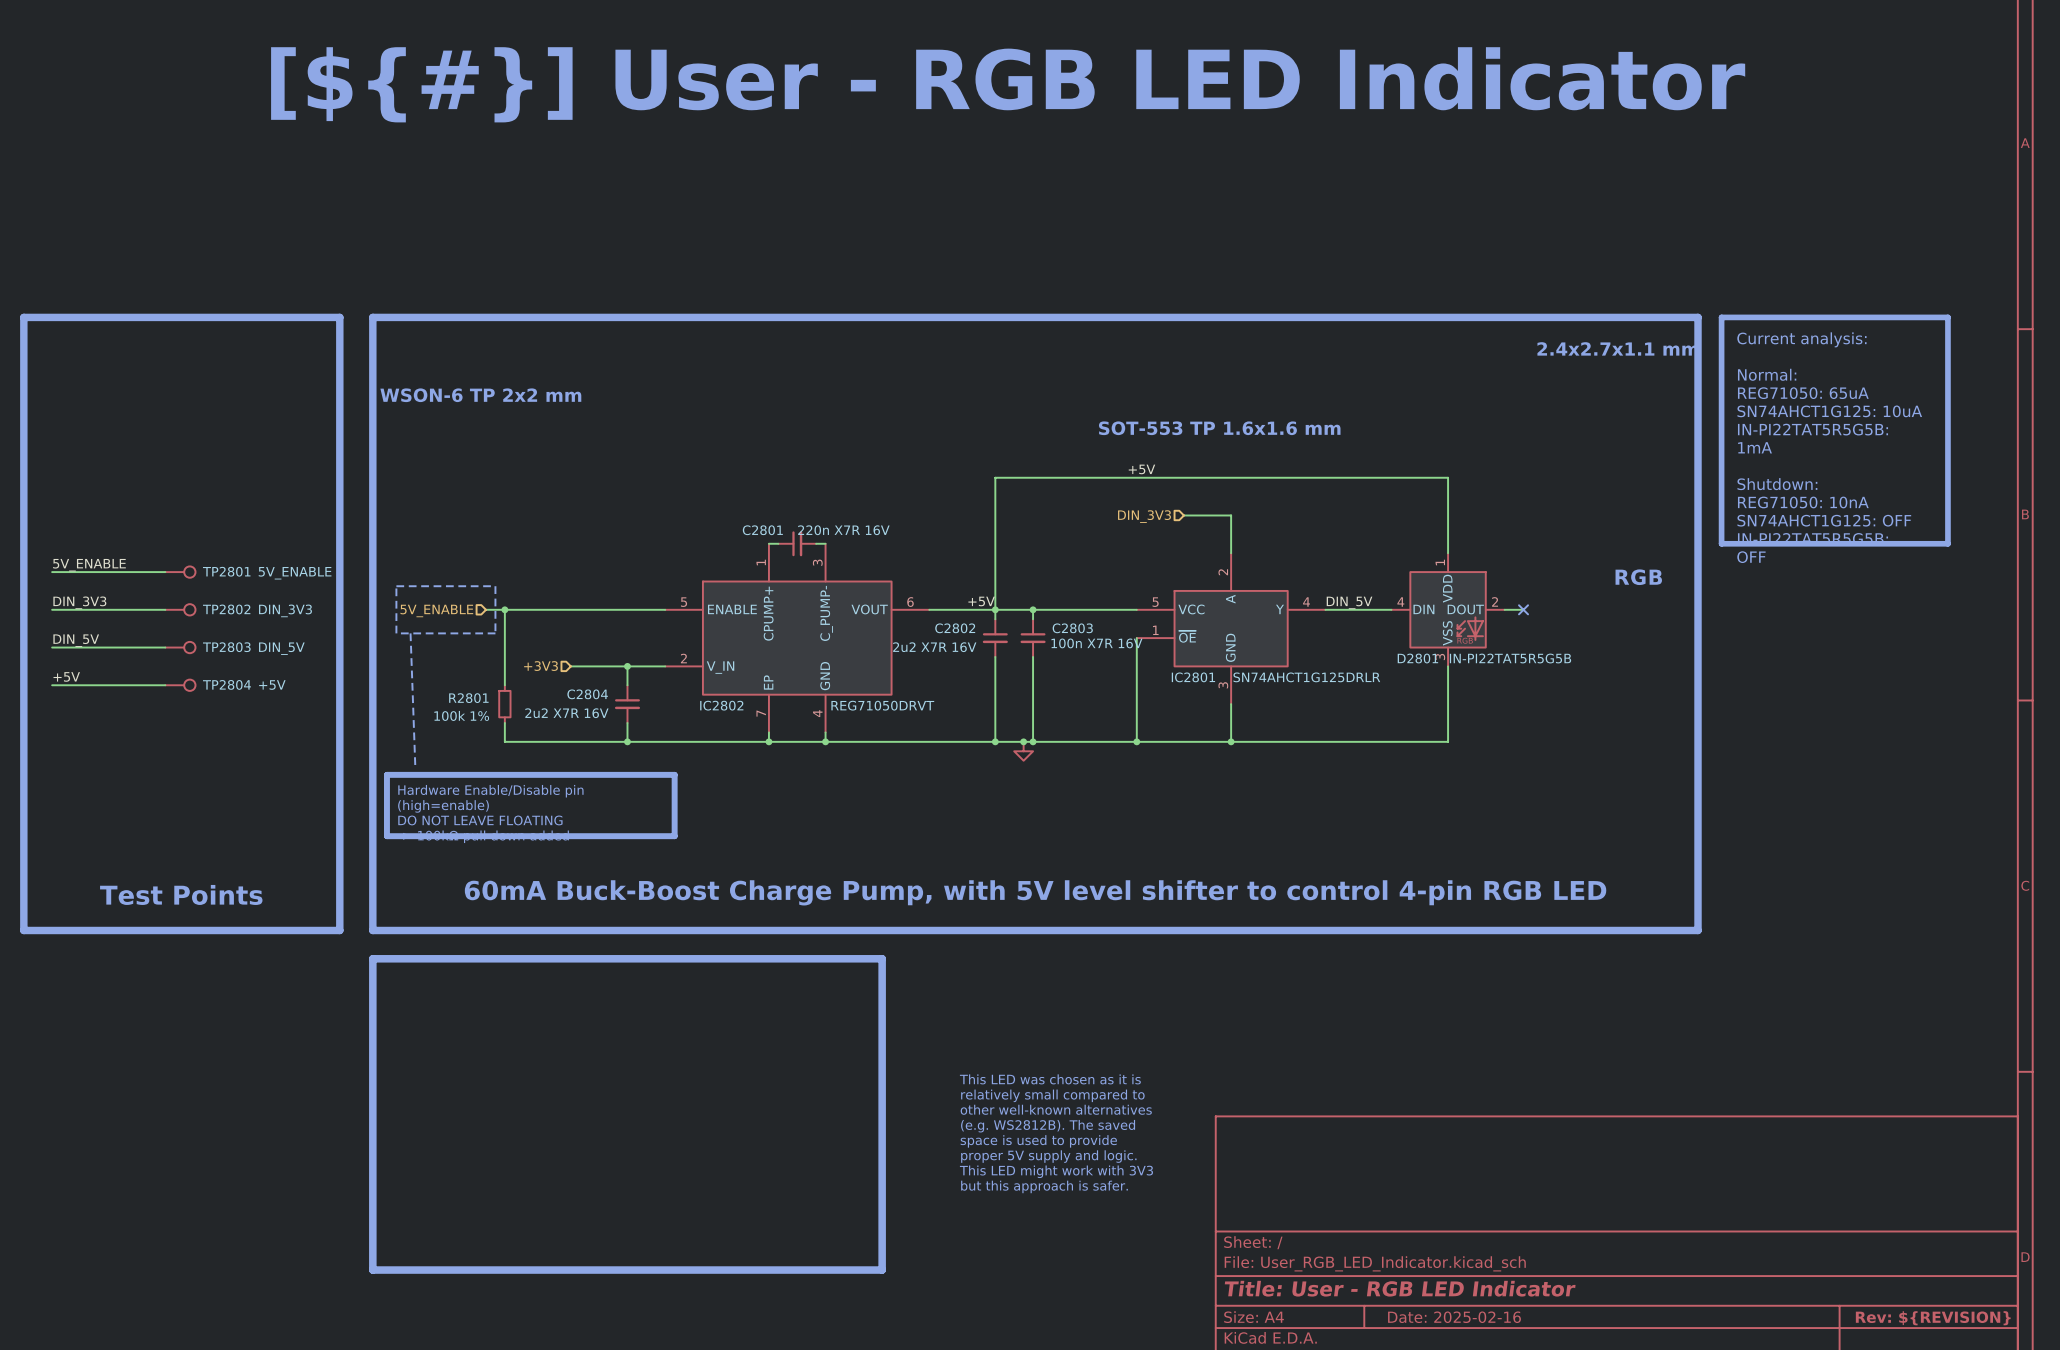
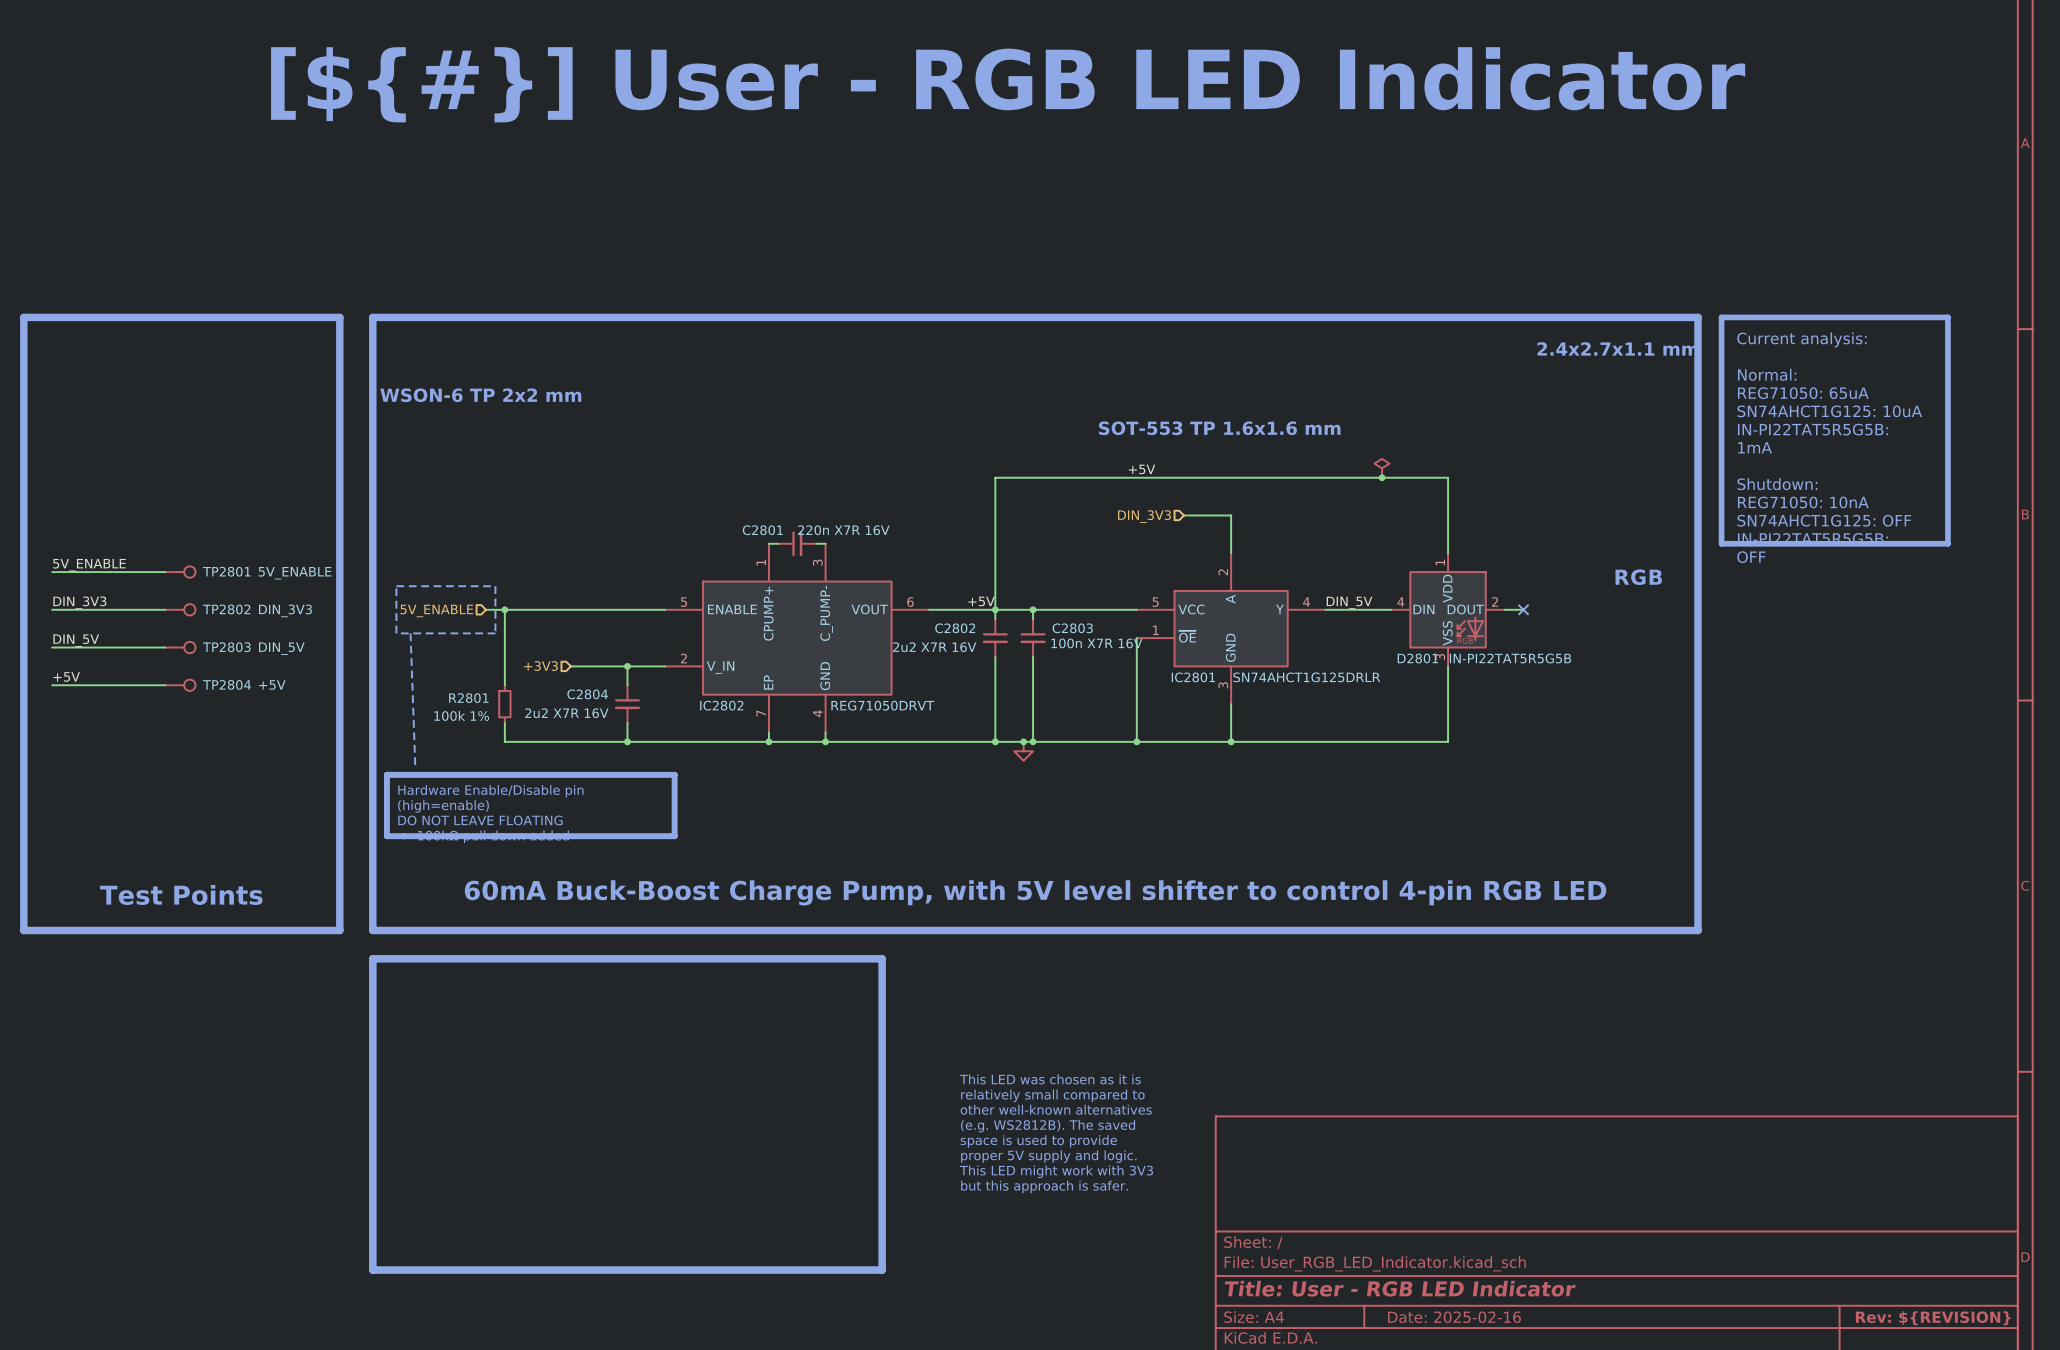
power symbol: none -> (1382, 468)
junction: none -> (1382, 477)

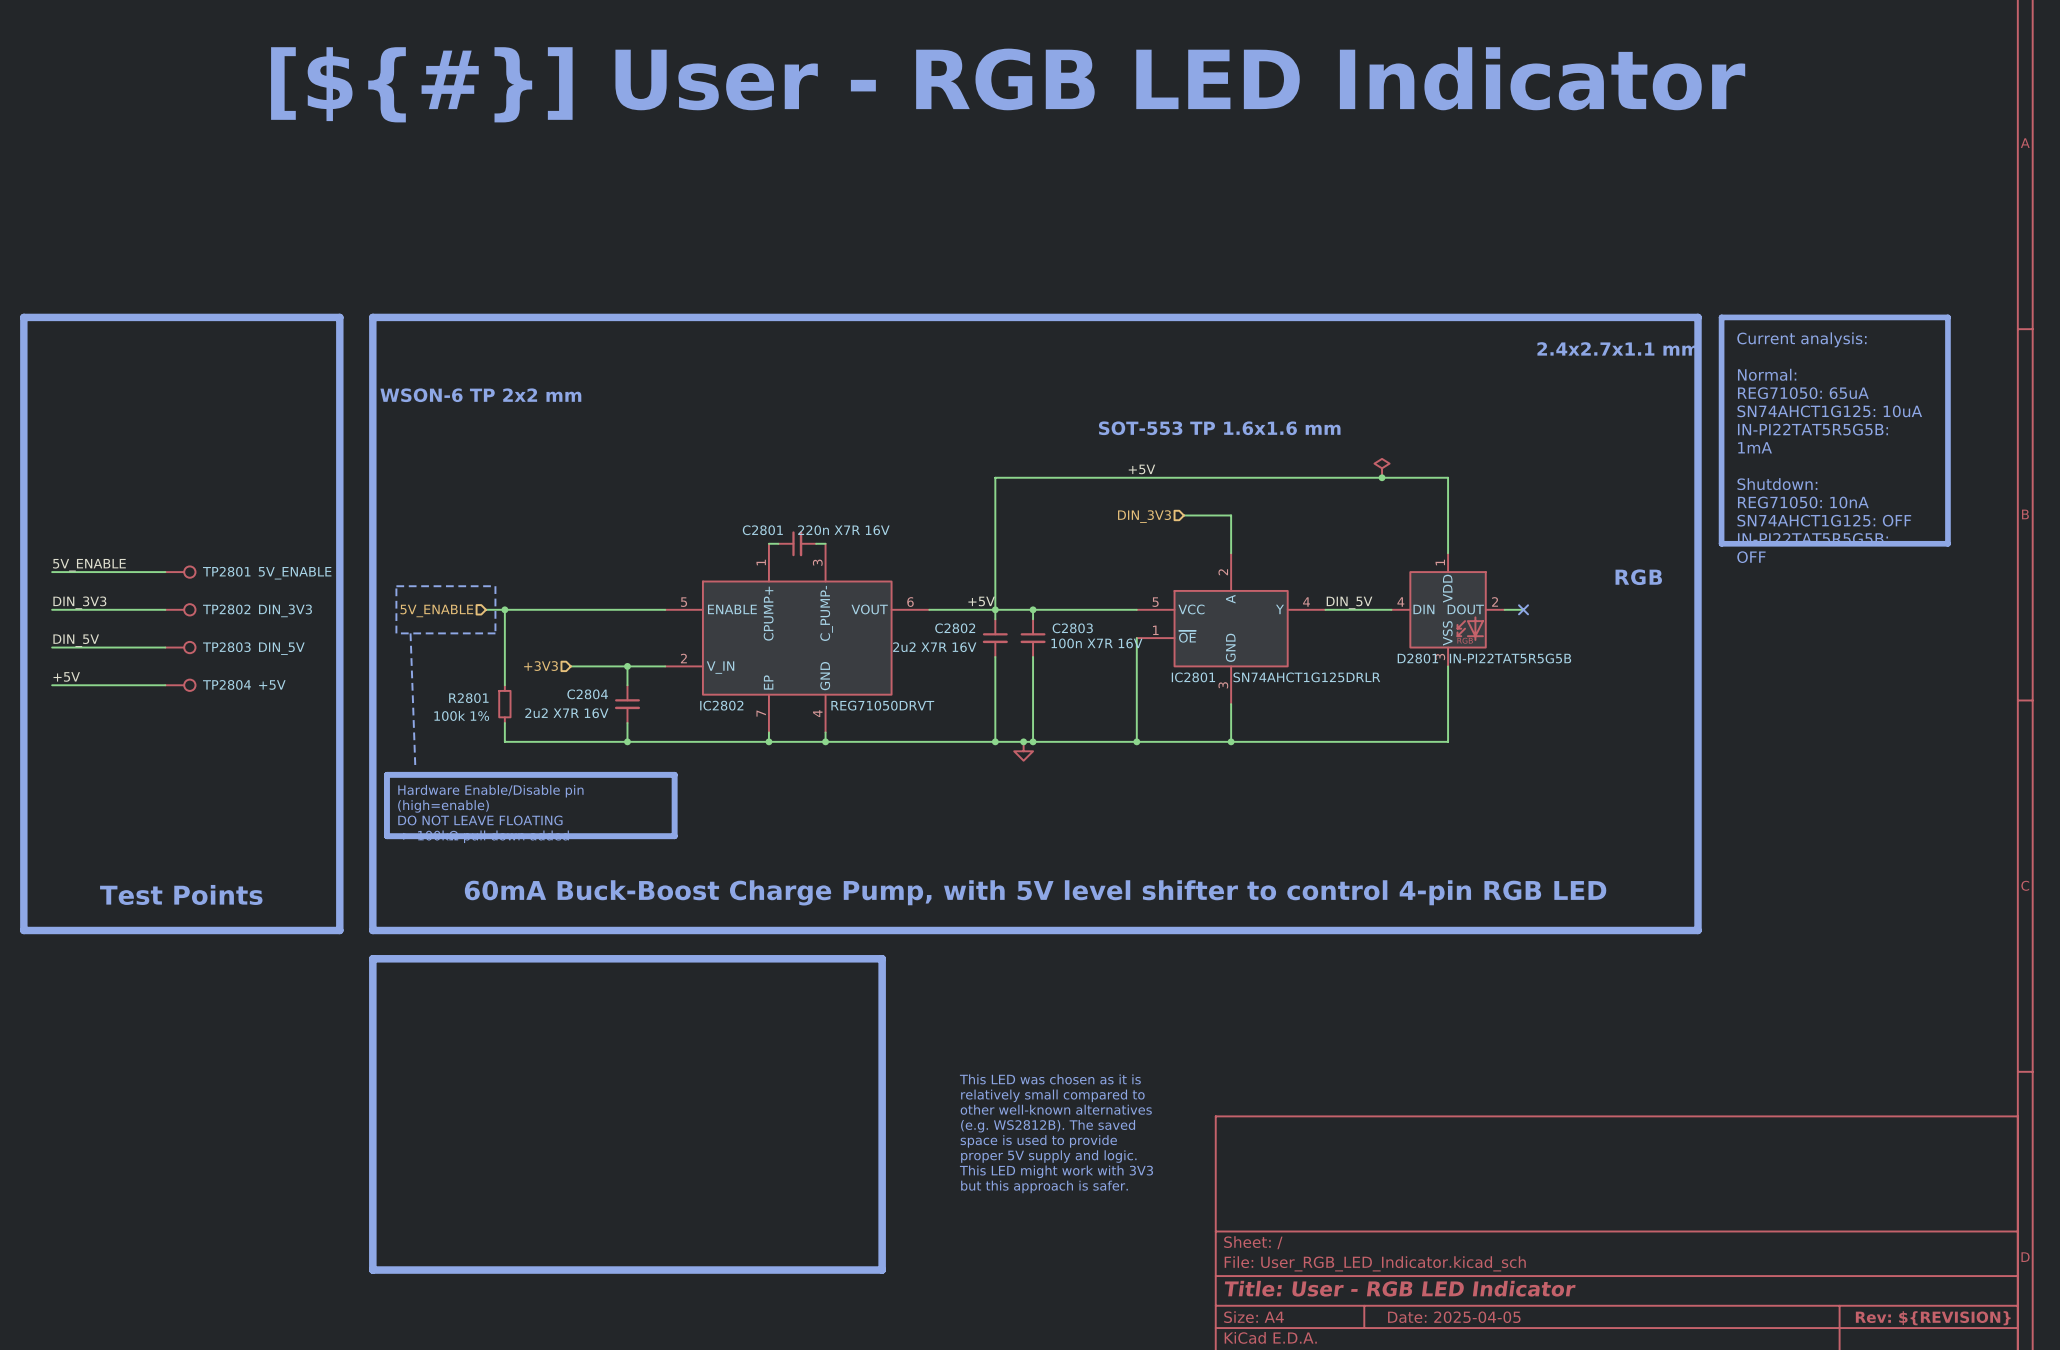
title block: Date: 2025-02-16 (1454, 1317) -> Date: 2025-04-05 (1454, 1317)

